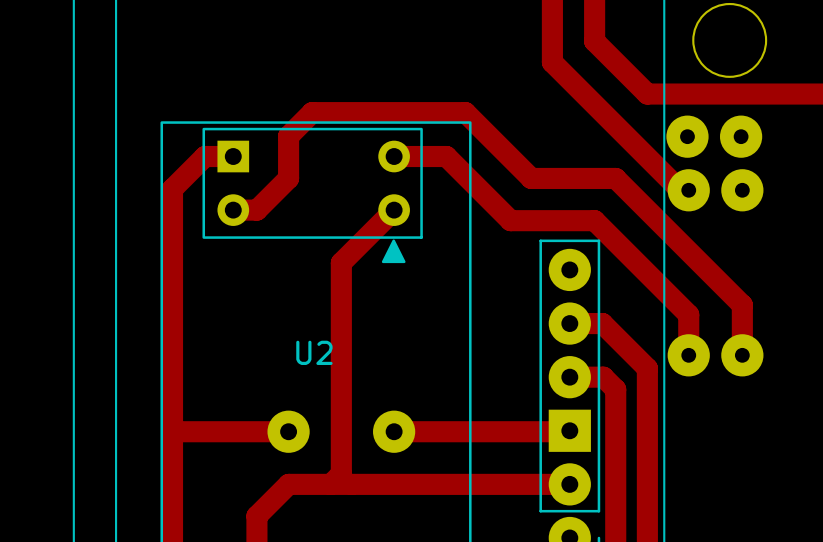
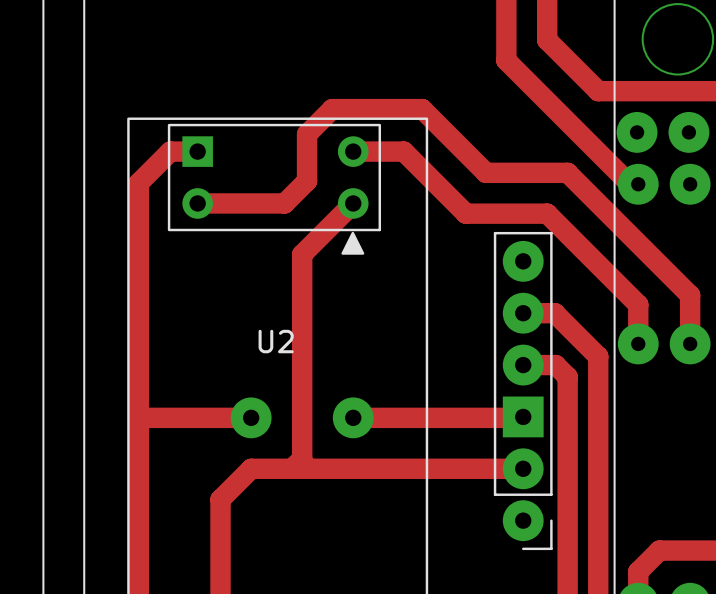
top track: (372, 112) (312, 112) (288, 136) (288, 178) (256, 210) -> (332, 109) (307, 134) (307, 181) (284, 203) (220, 203)

